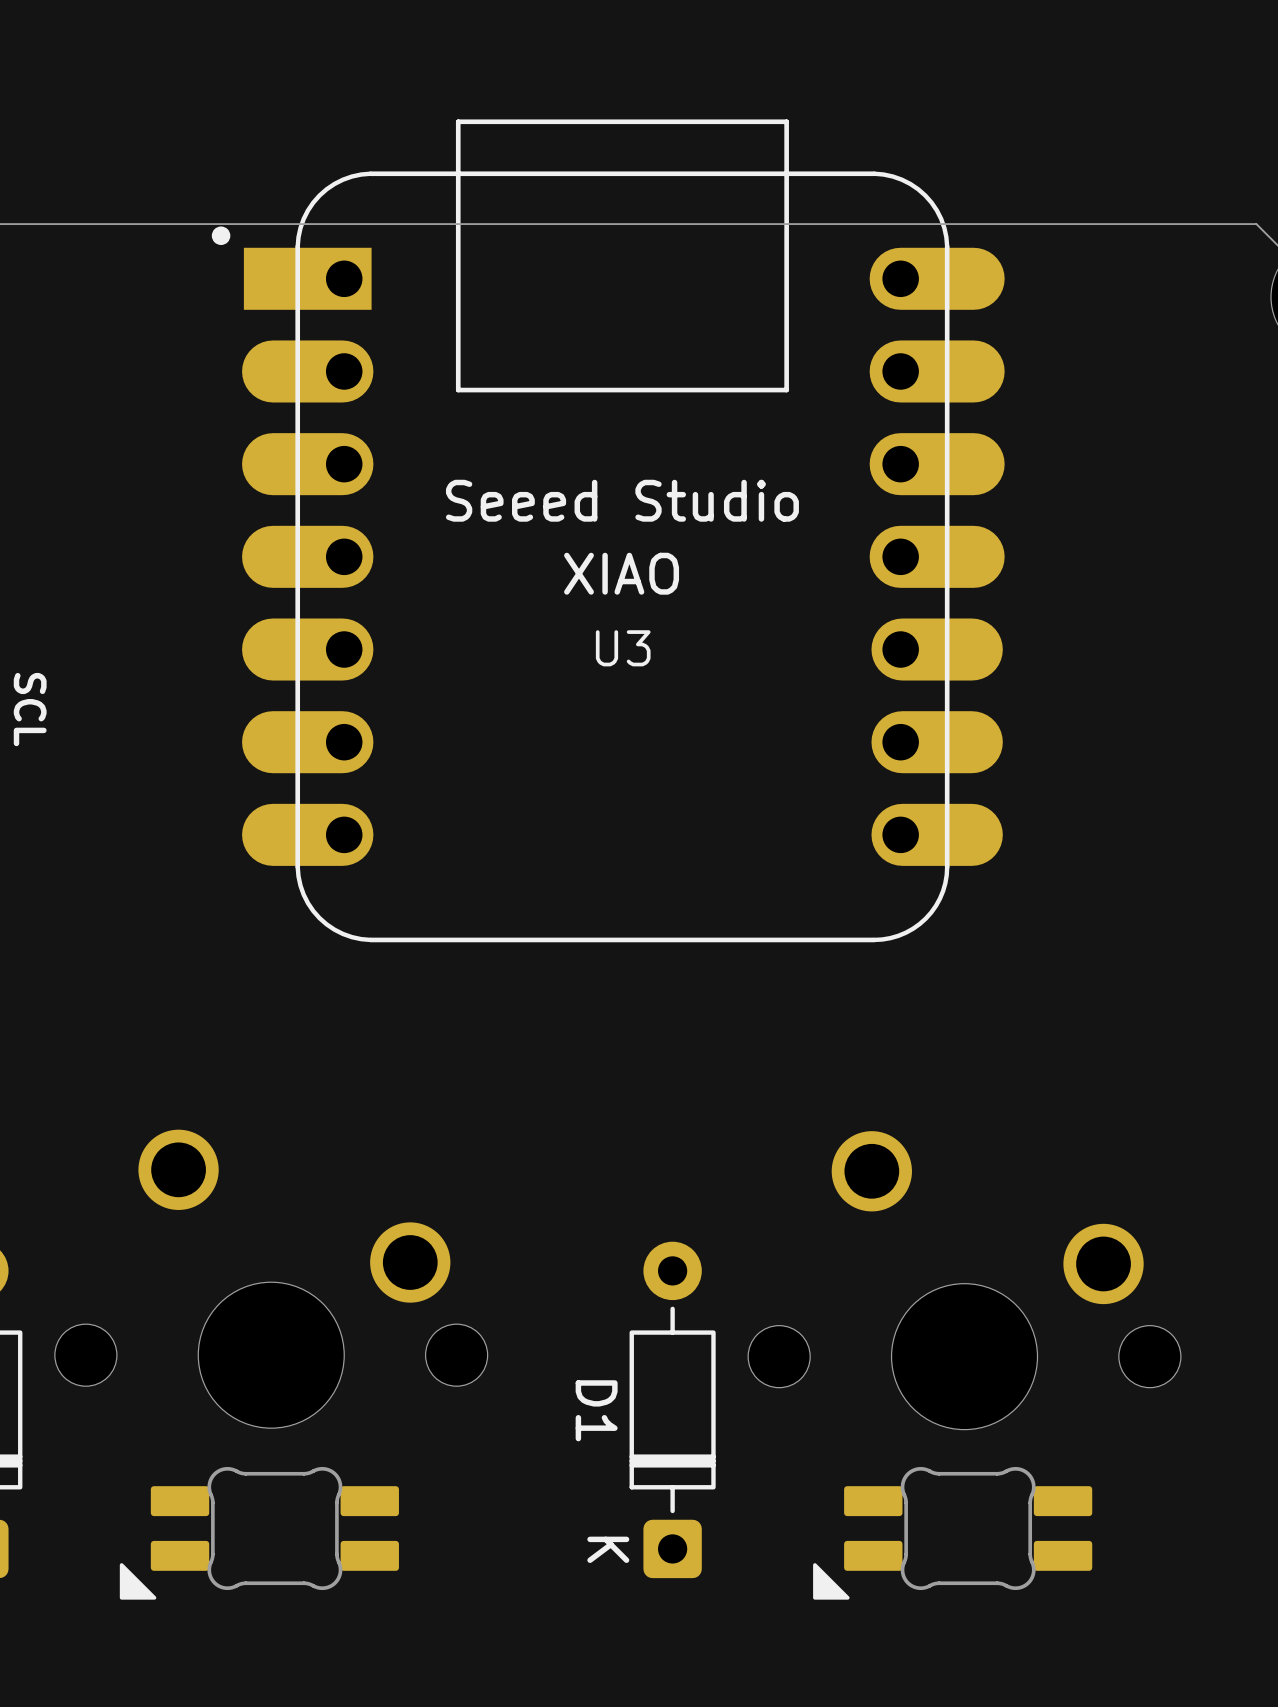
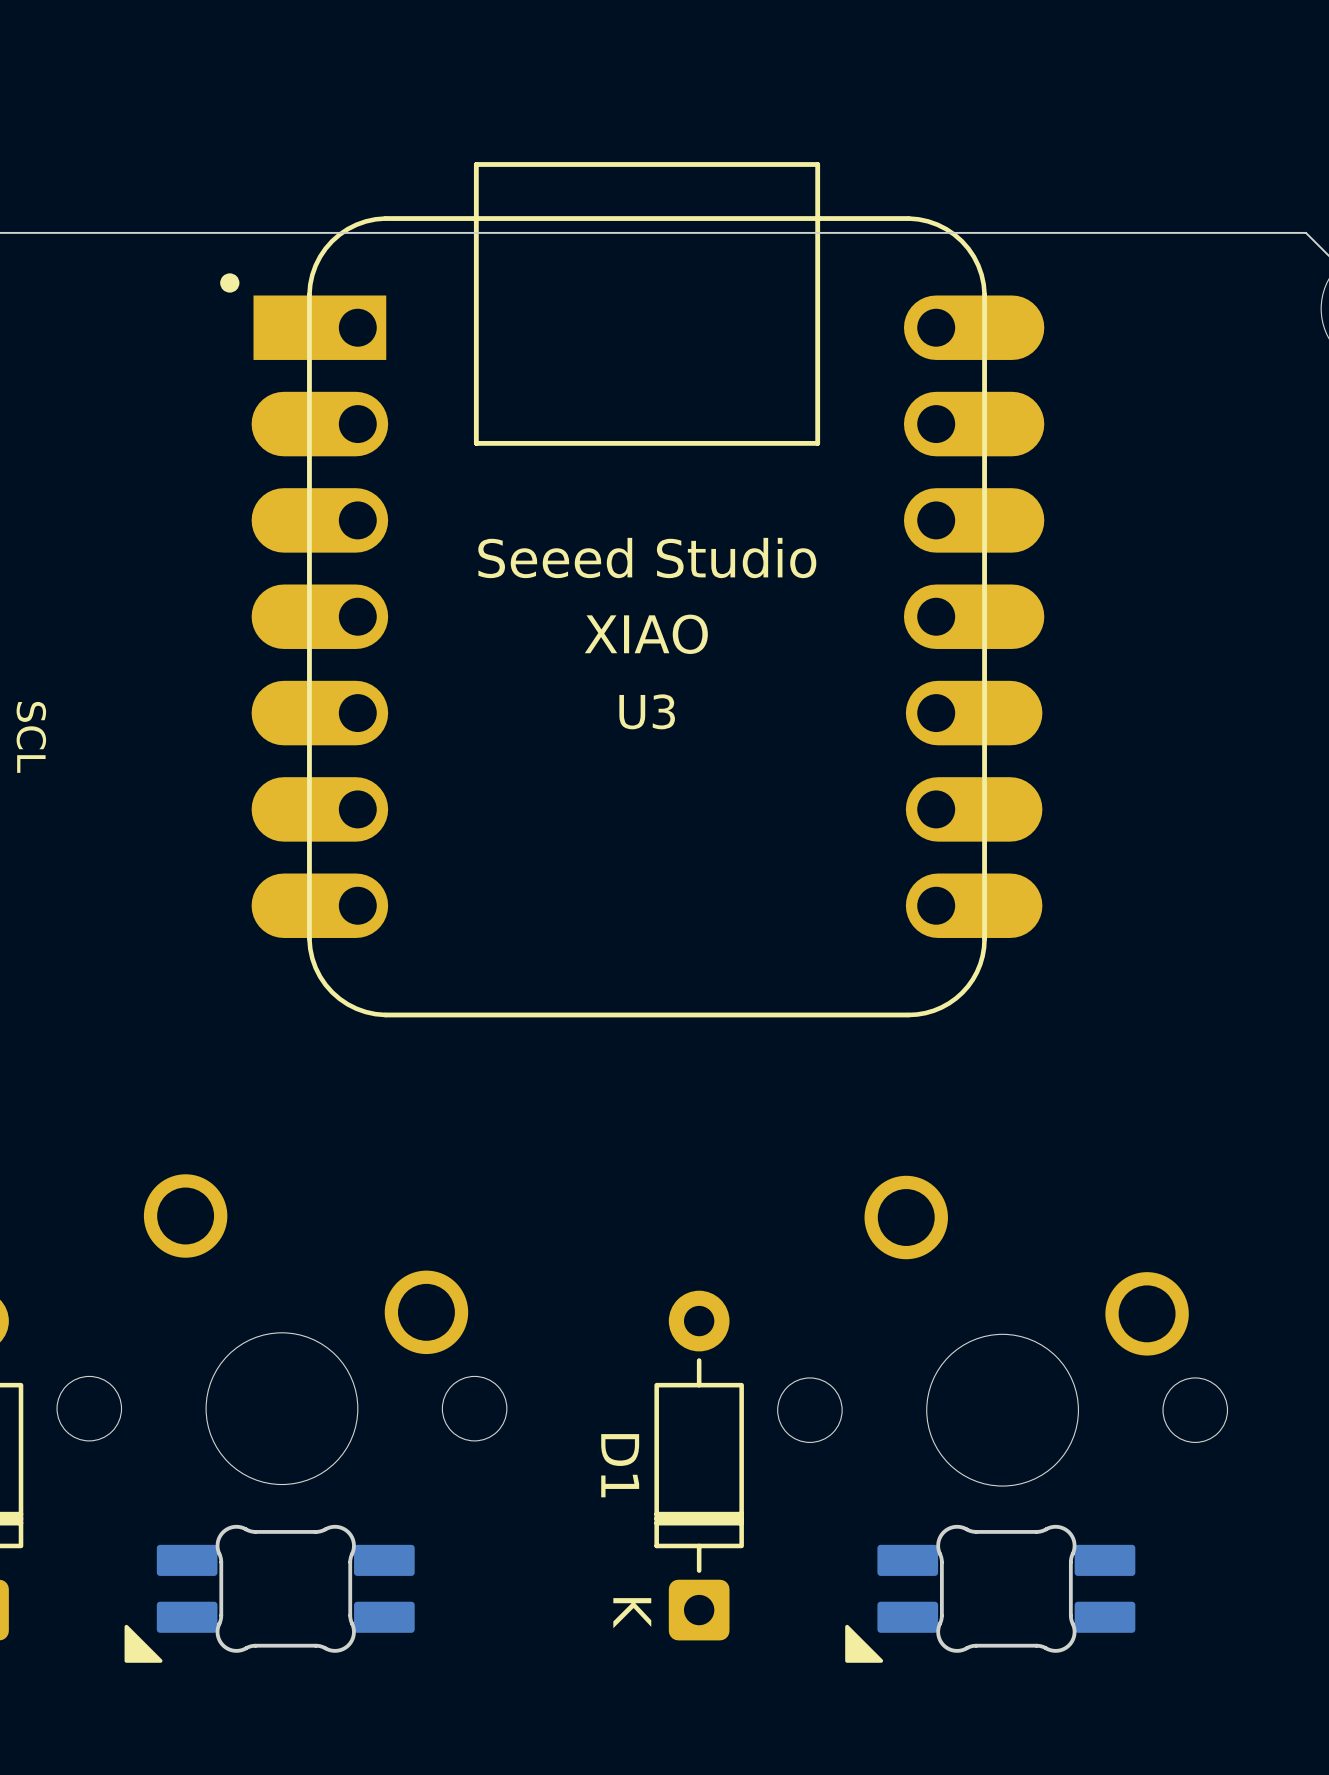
U3 position: (608, 530) -> (632, 589)

